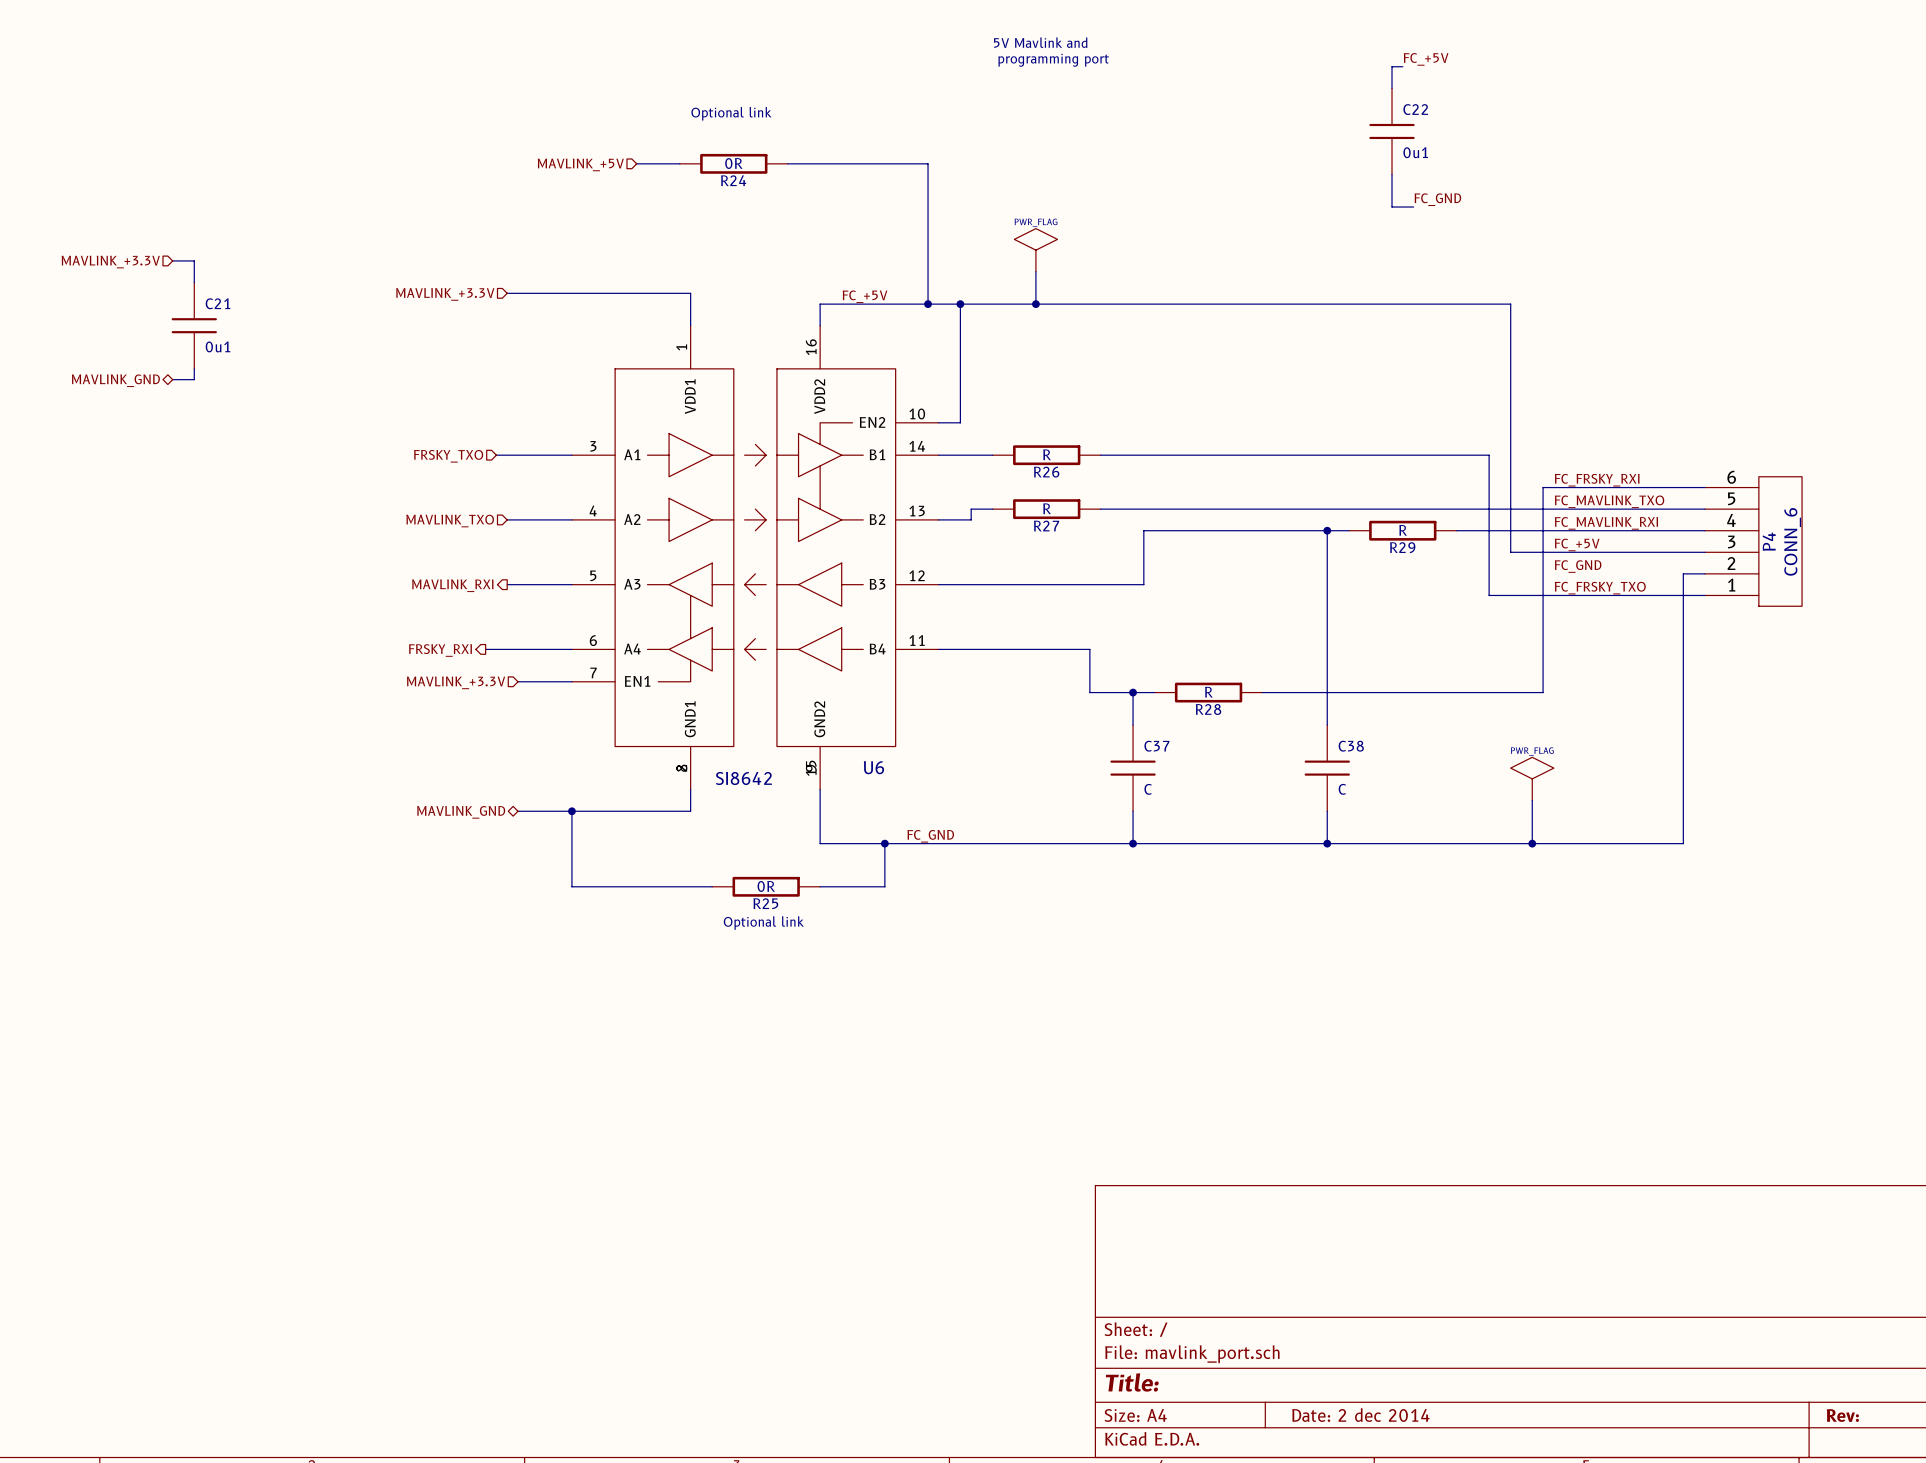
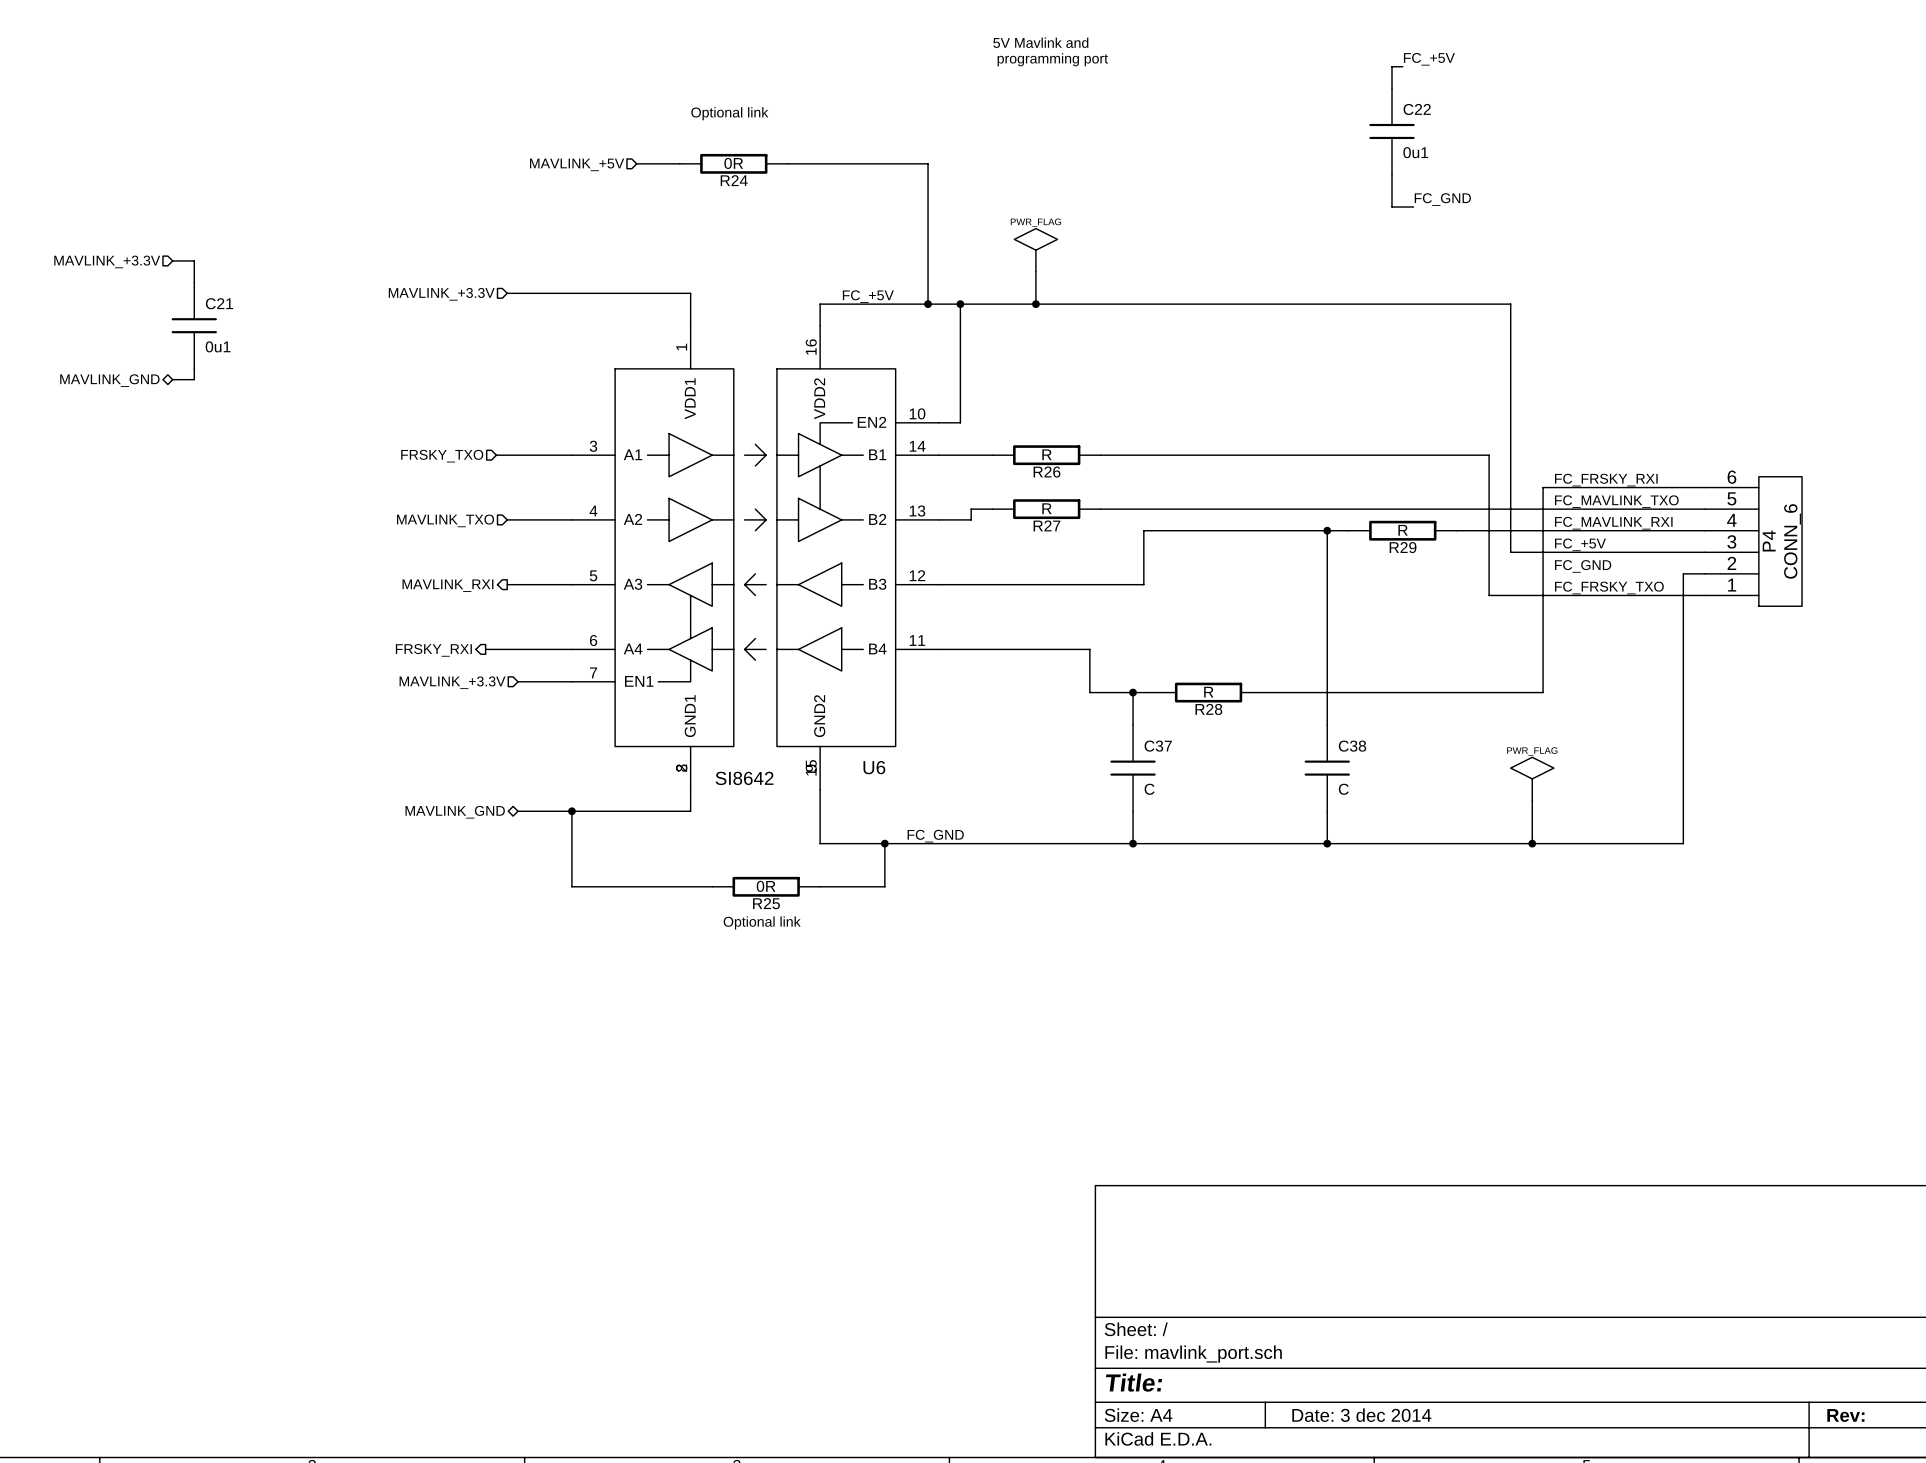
title block: Date: 2 dec 2014 (1360, 1415) -> Date: 3 dec 2014 (1361, 1415)

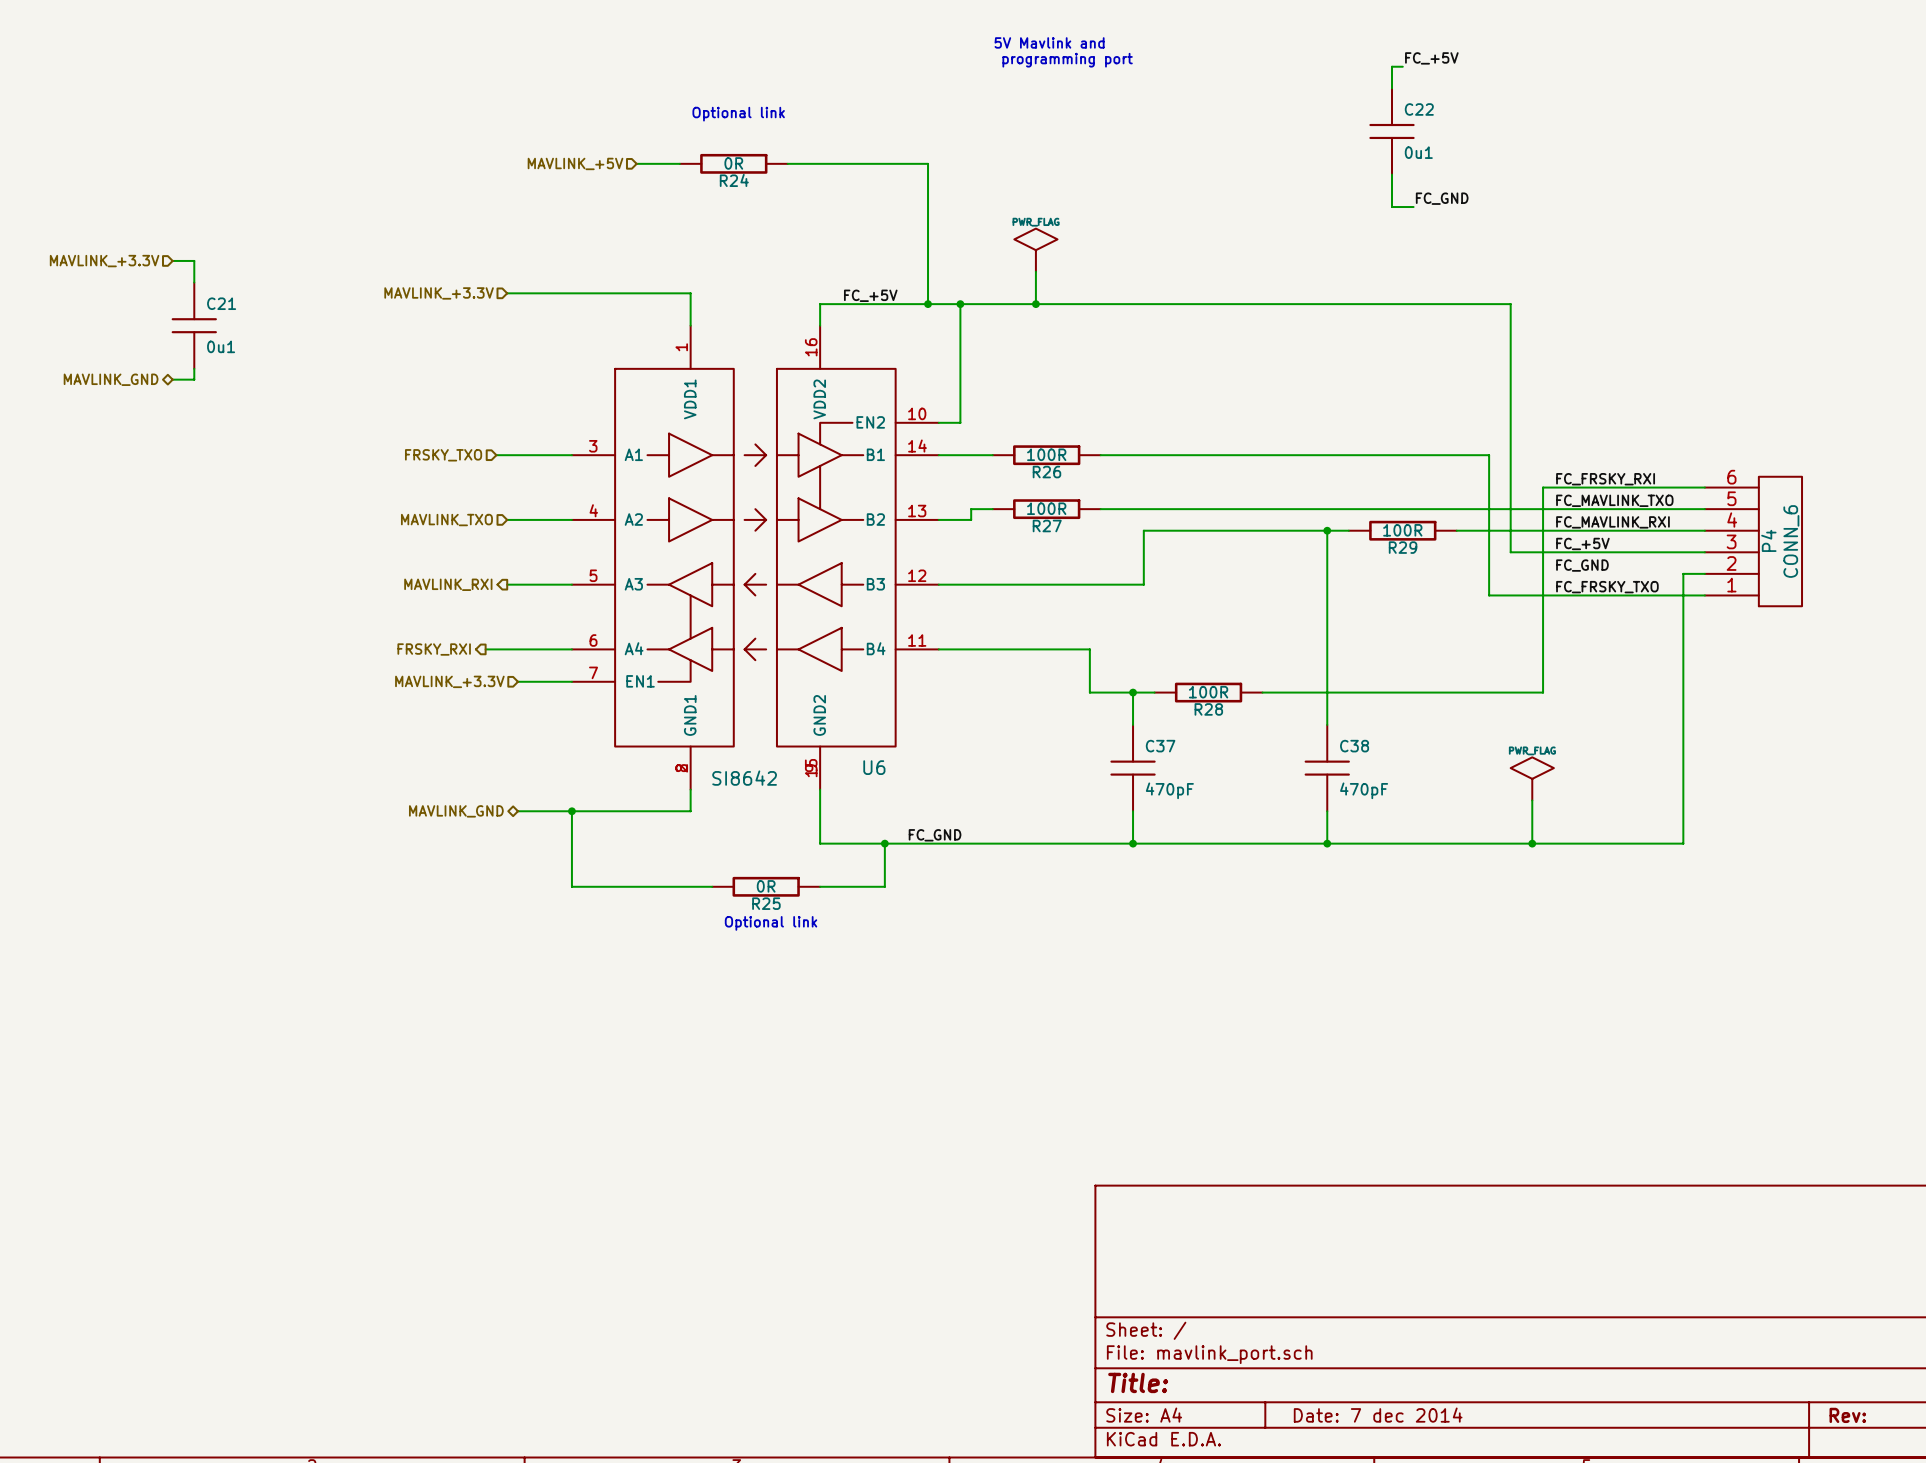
R26 value: R (1046, 454) -> 100R (1046, 454)
R27 value: R (1046, 508) -> 100R (1046, 508)
R29 value: R (1403, 530) -> 100R (1402, 530)
R28 value: R (1208, 692) -> 100R (1208, 692)
C37 value: C (1149, 789) -> 470pF (1169, 790)
C38 value: C (1343, 789) -> 470pF (1364, 790)
title block: Date: 3 dec 2014 (1361, 1415) -> Date: 7 dec 2014 (1378, 1415)

